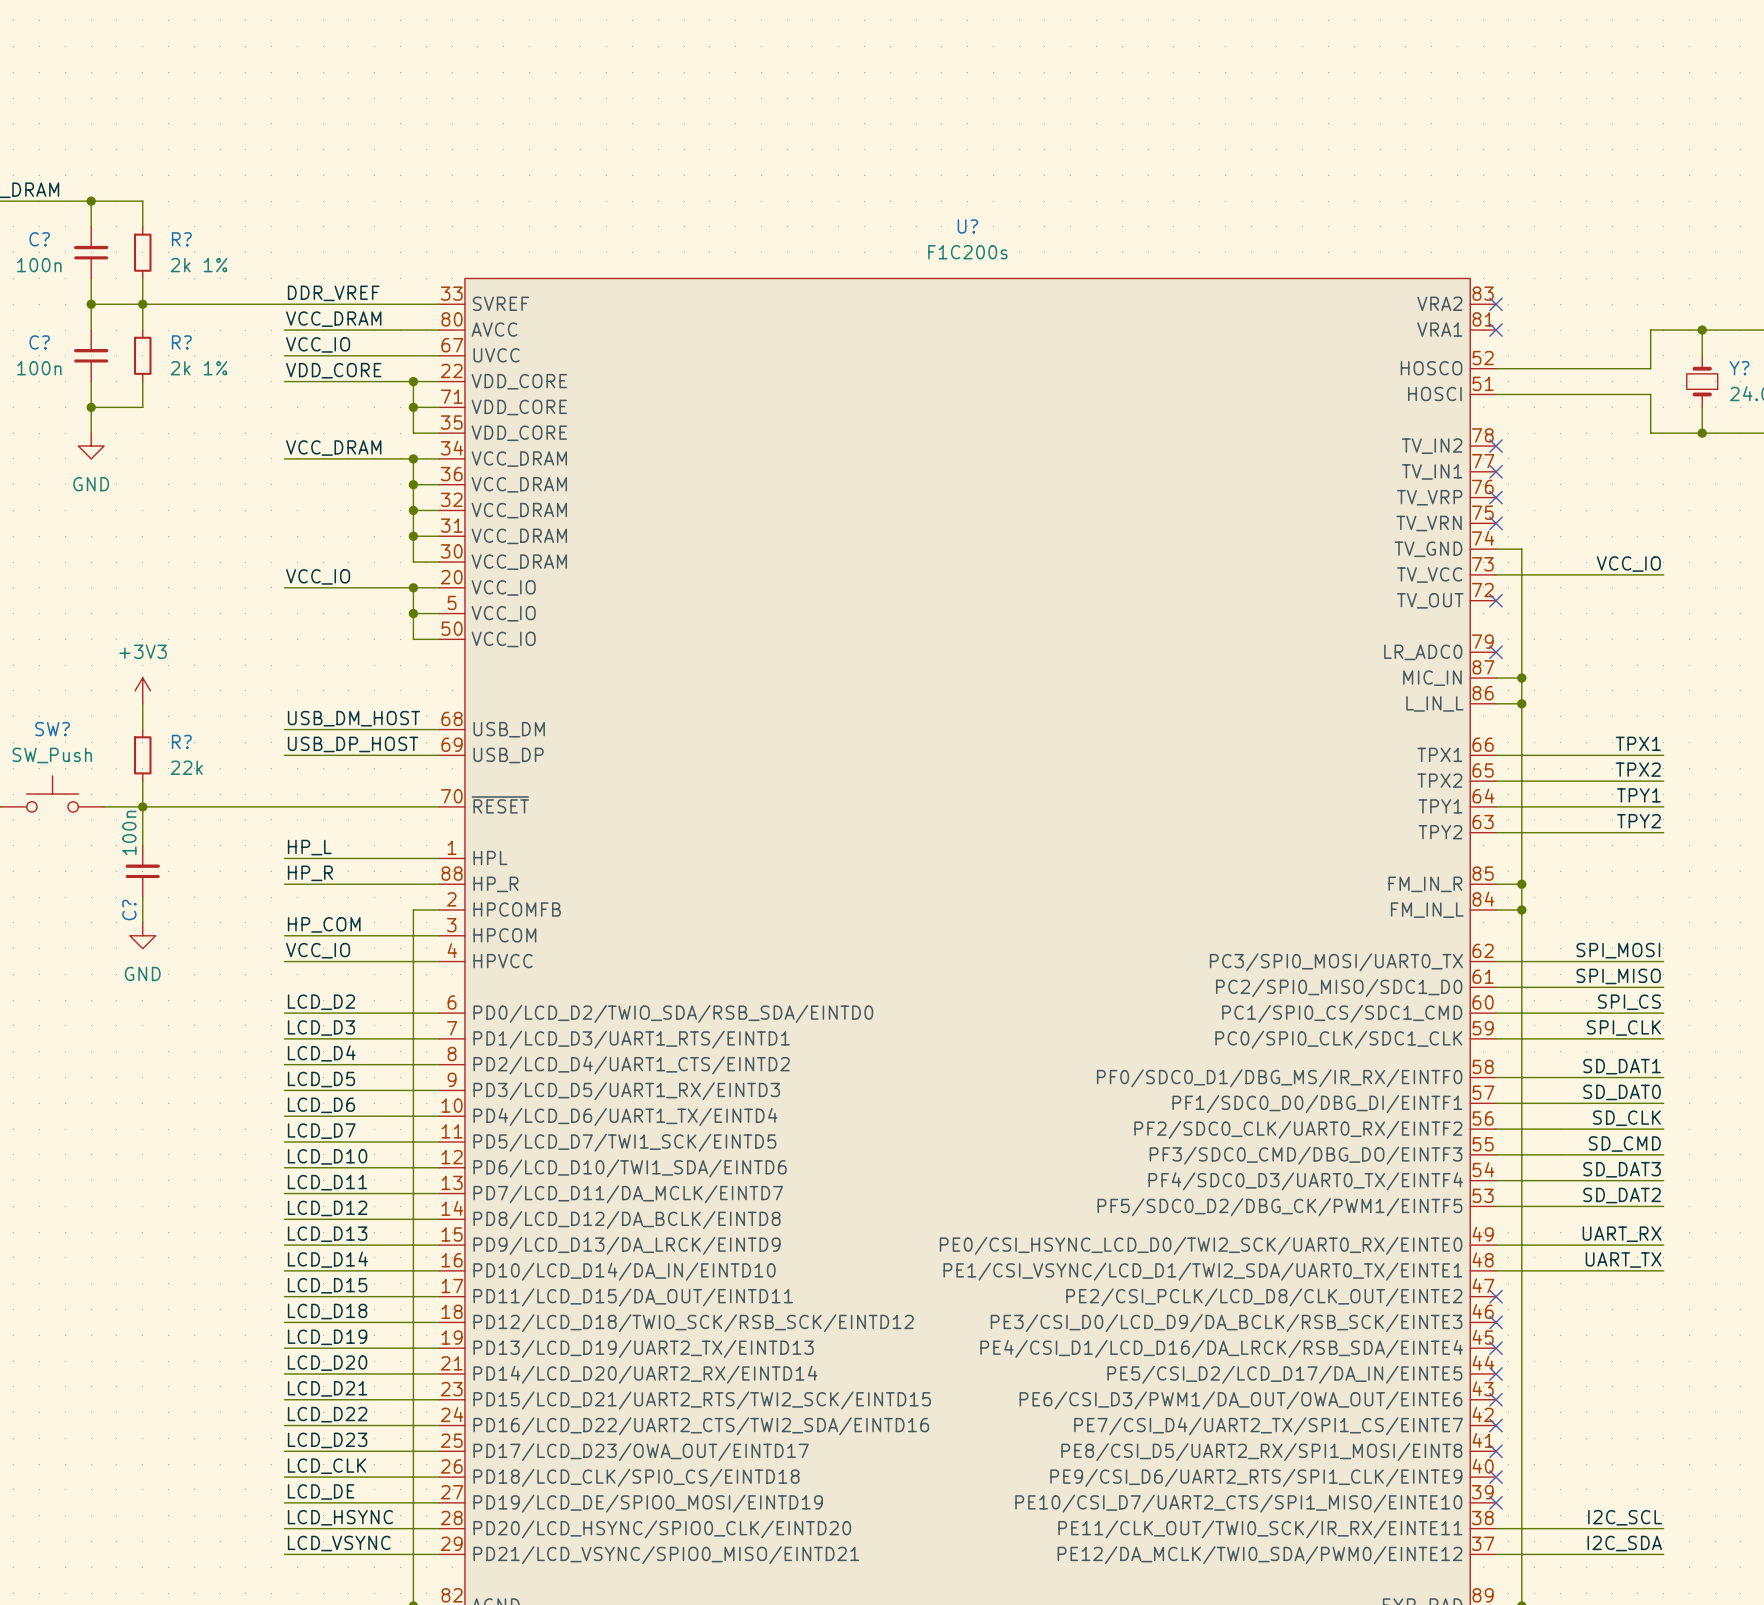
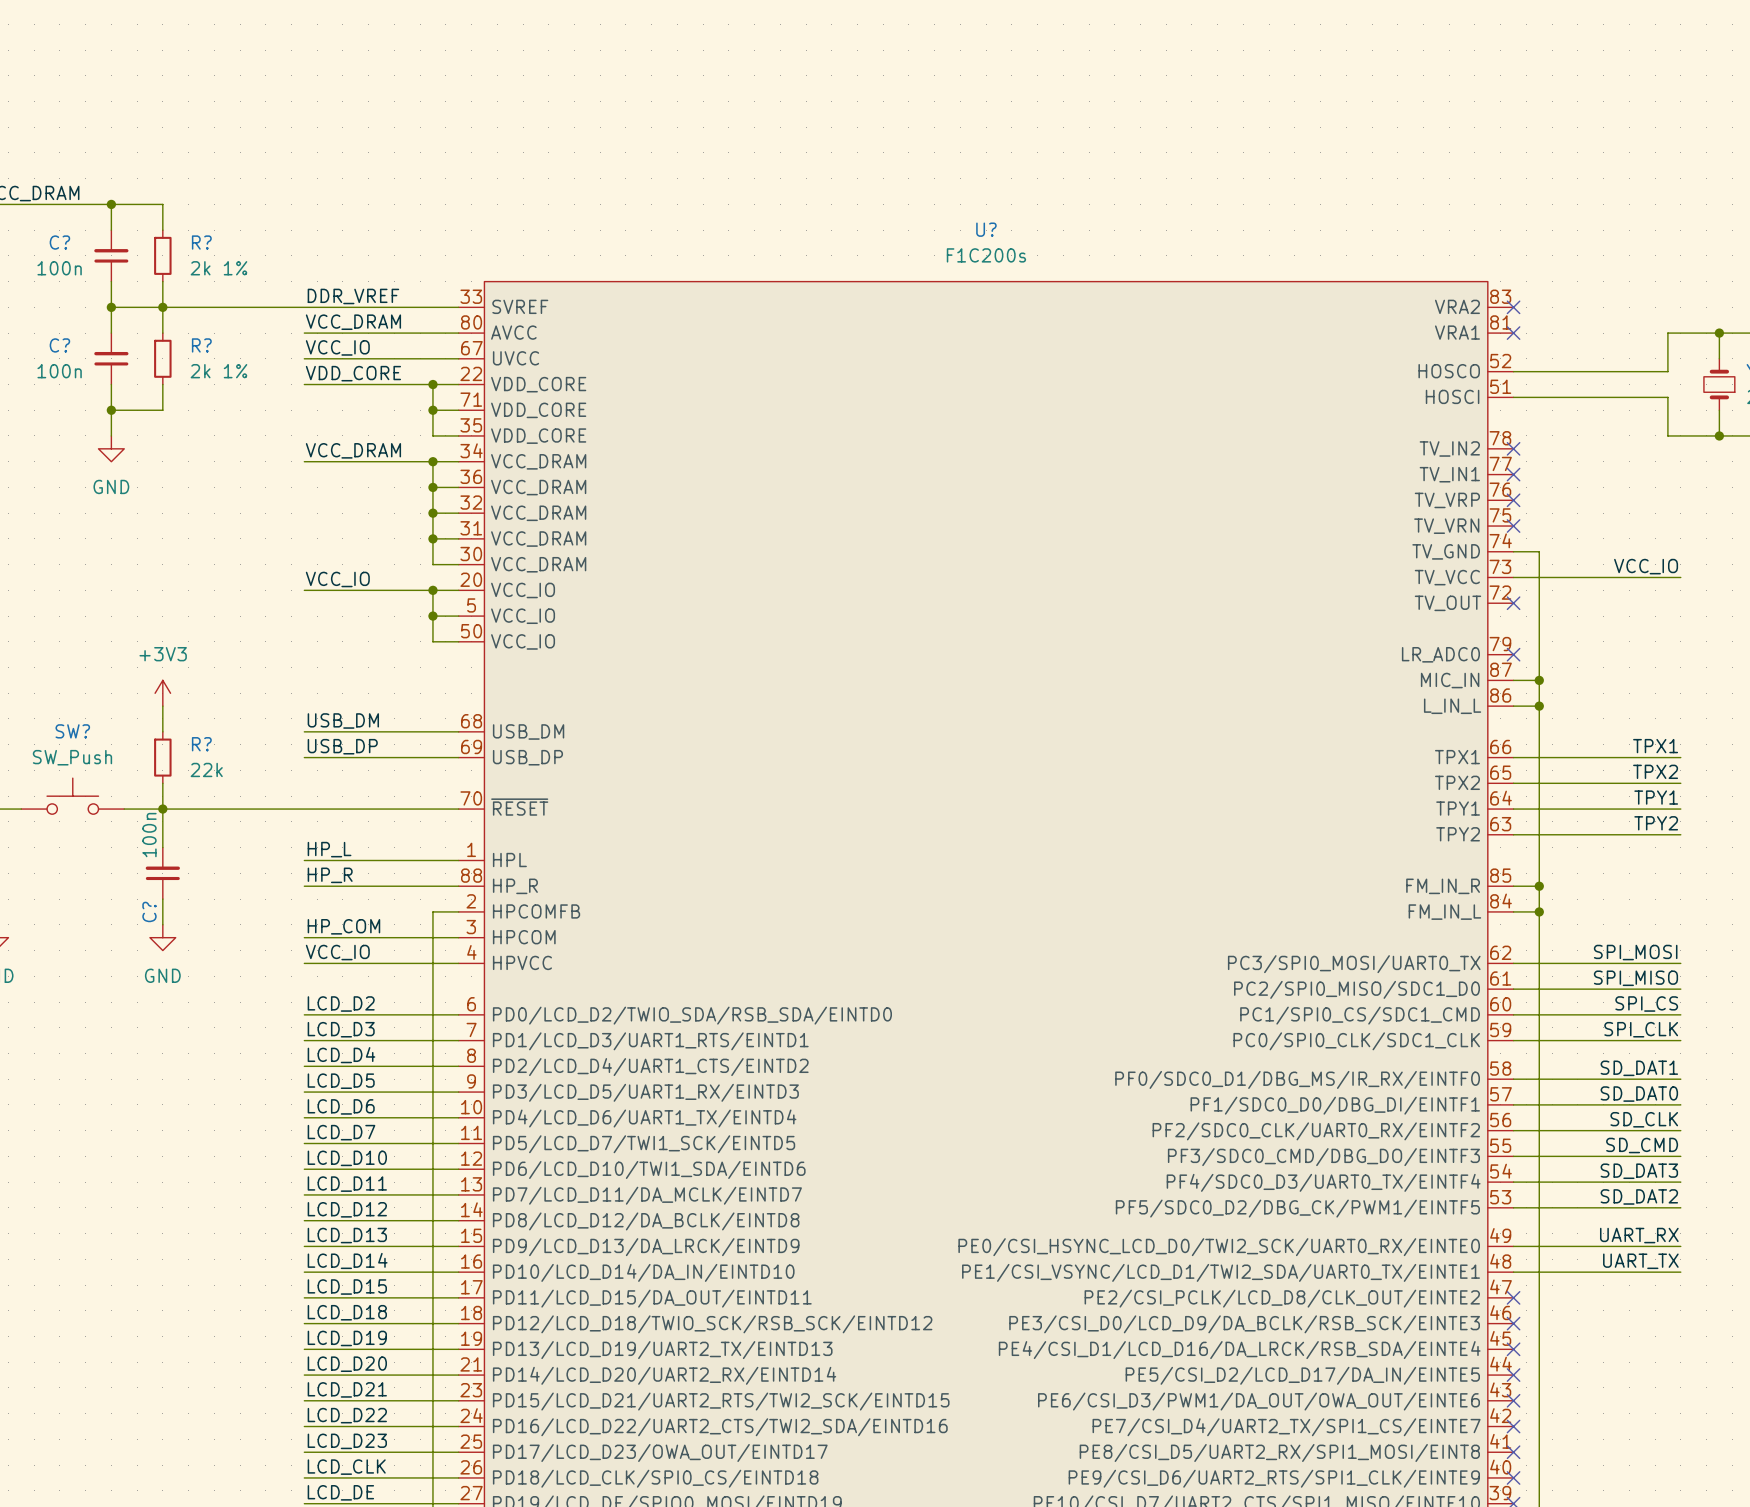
label: USB_DM_HOST (353, 718) -> USB_DM (343, 720)
label: USB_DP_HOST (353, 744) -> USB_DP (342, 746)

